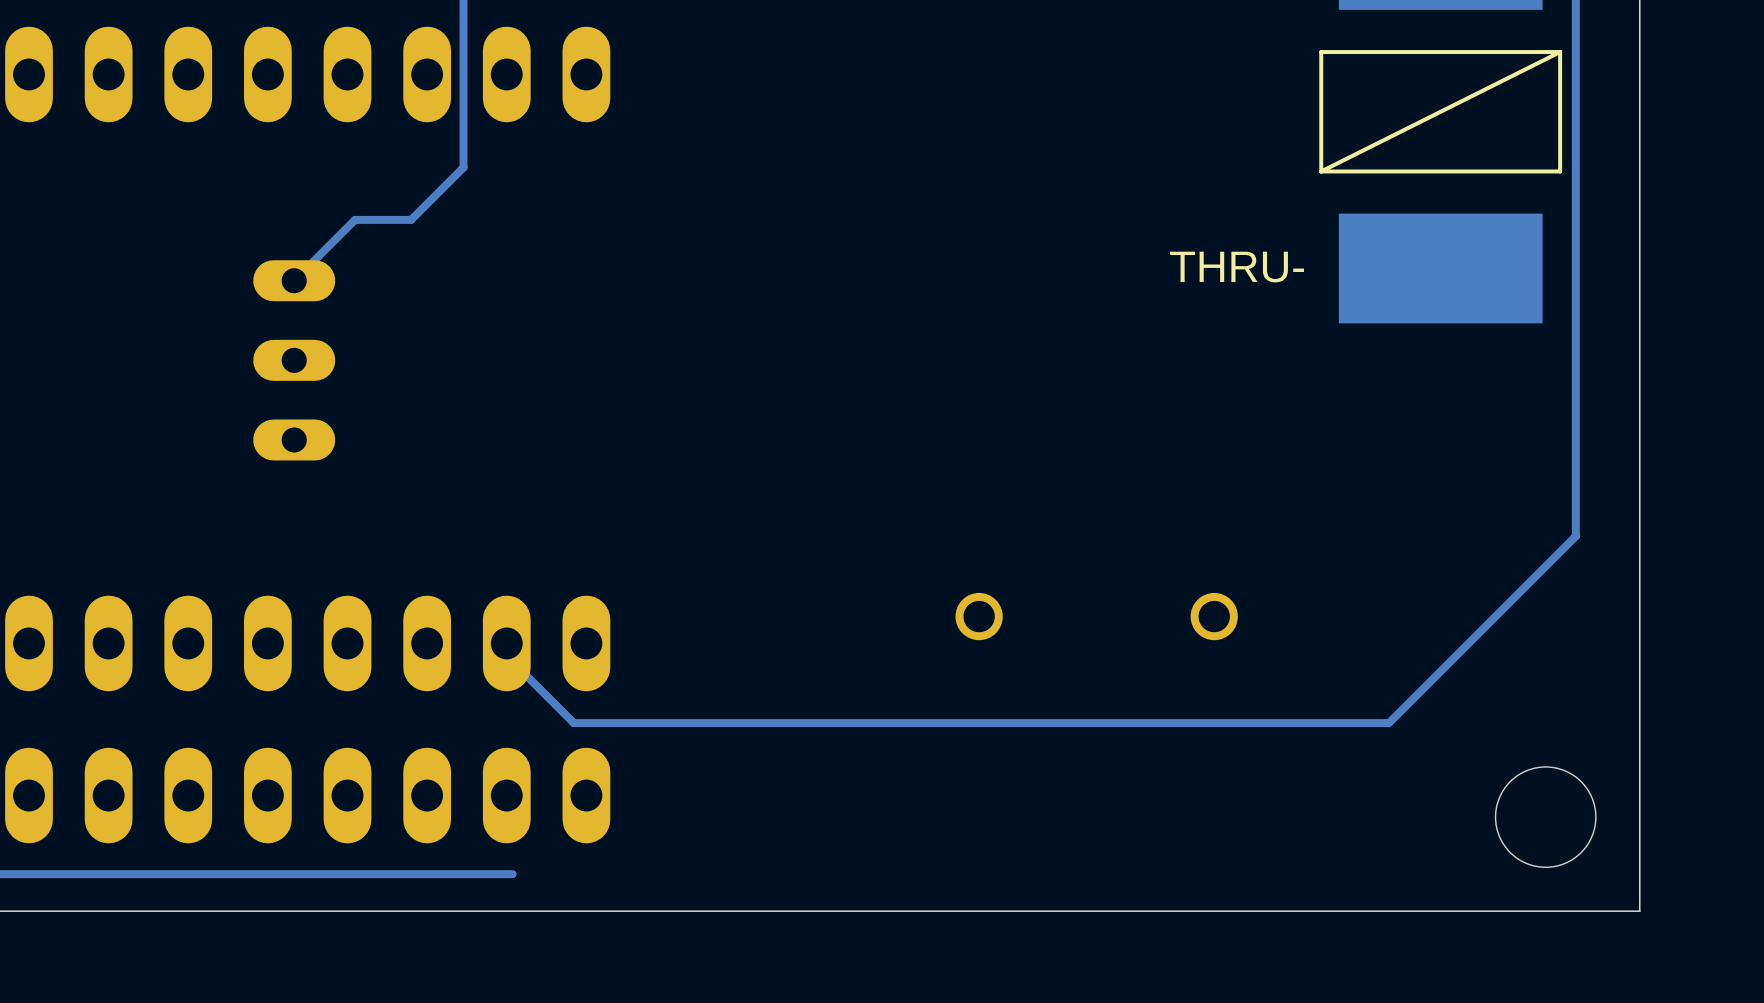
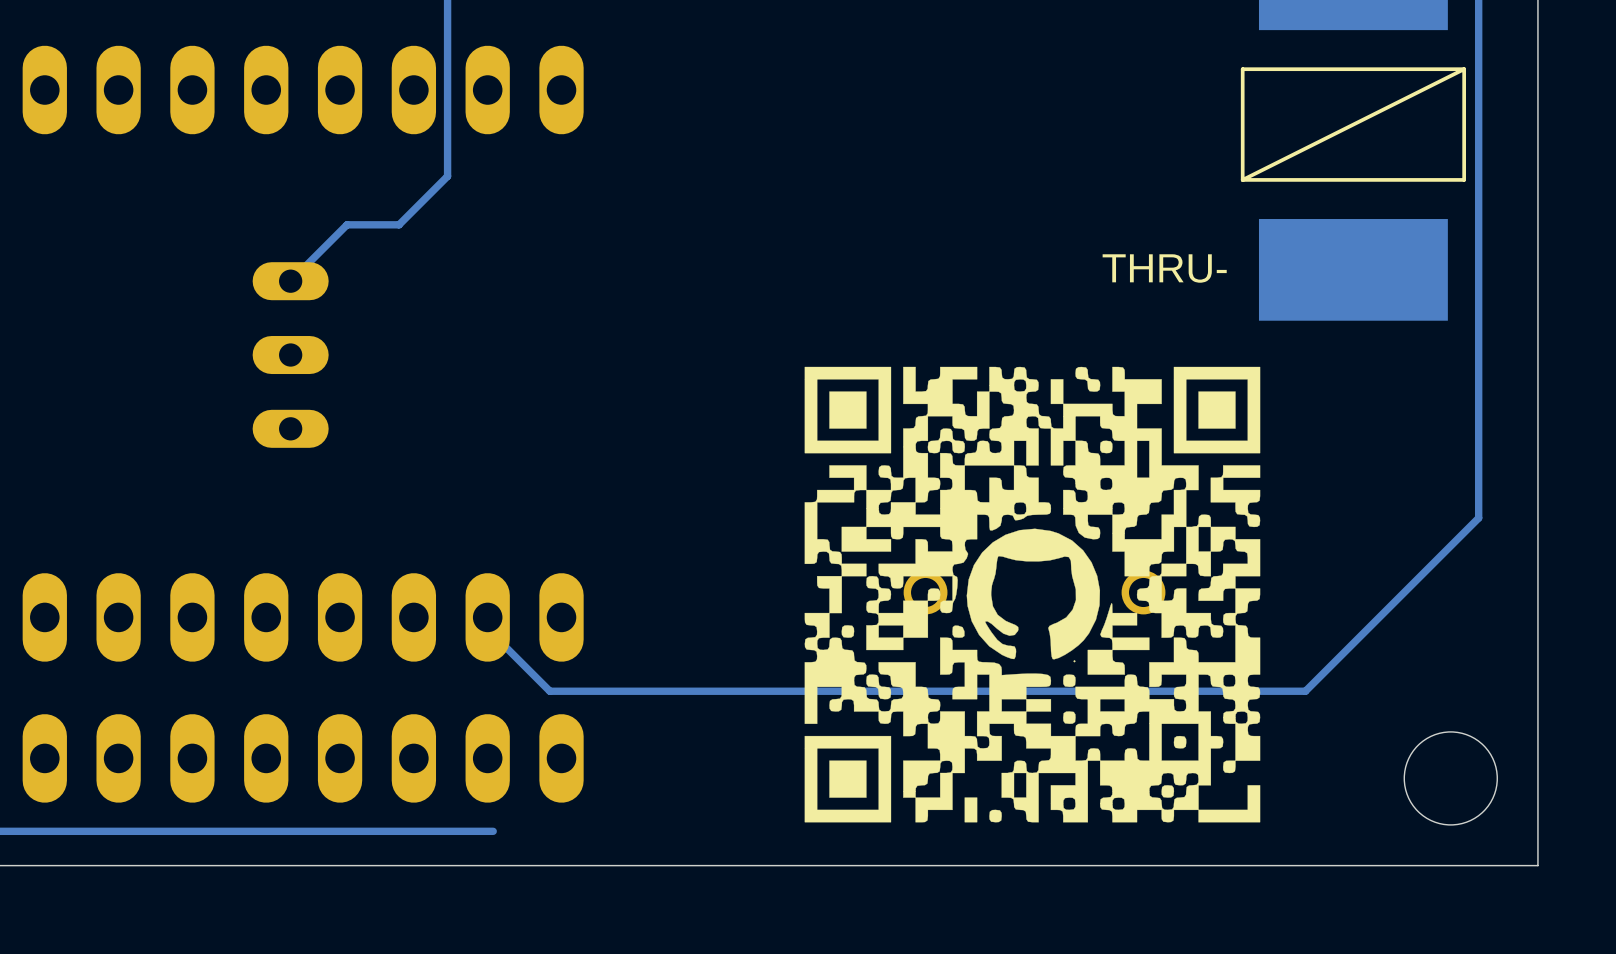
drawing: none -> [804, 366, 1261, 823]

